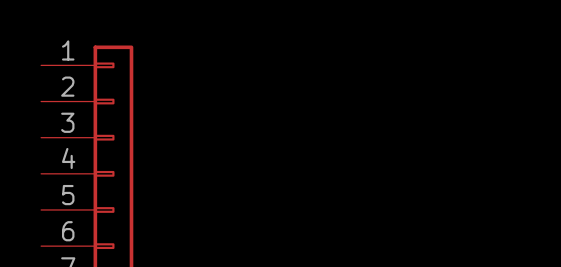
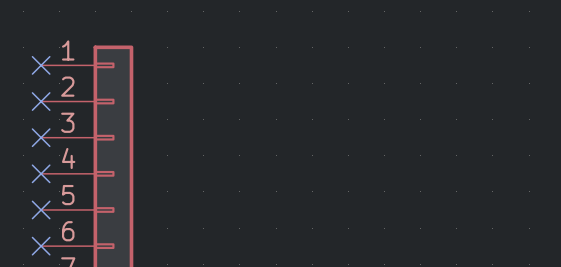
no-connect mark: none -> (41, 65)
no-connect mark: none -> (41, 101)
no-connect mark: none -> (41, 137)
no-connect mark: none -> (41, 173)
no-connect mark: none -> (41, 209)
no-connect mark: none -> (41, 246)

